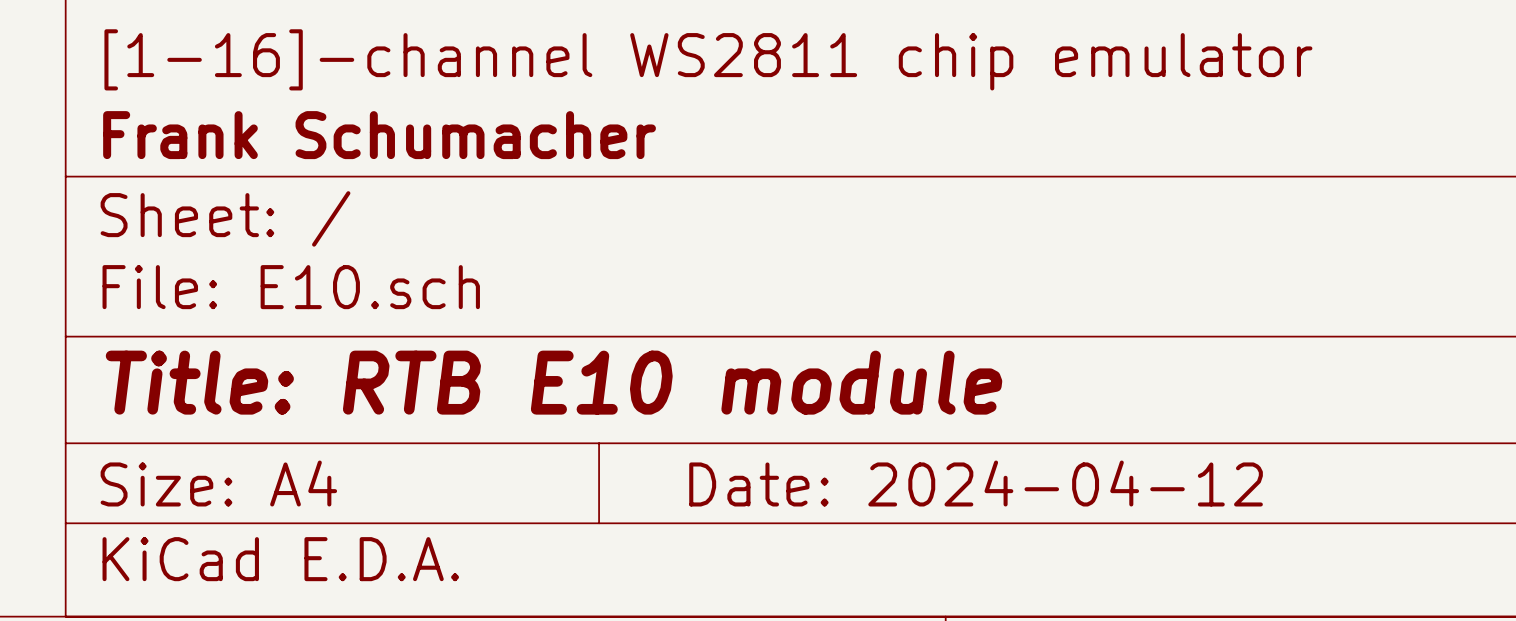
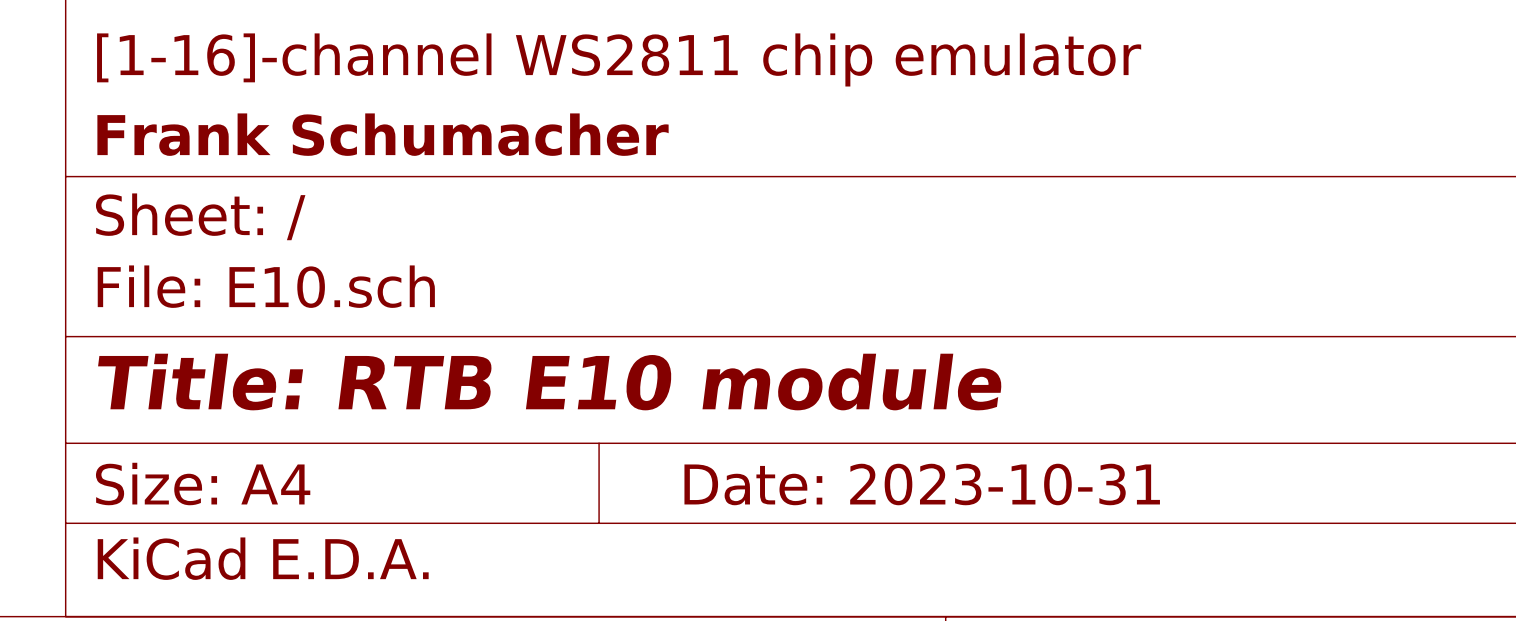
title block: Date: 2024-04-12 (976, 483) -> Date: 2023-10-31 (922, 484)

